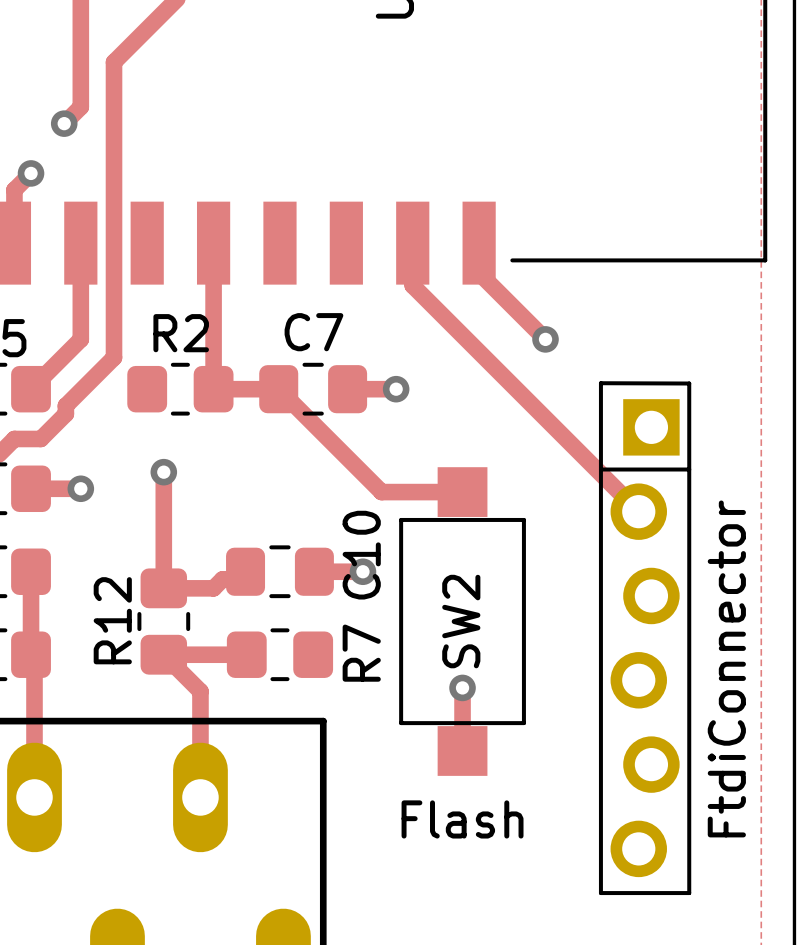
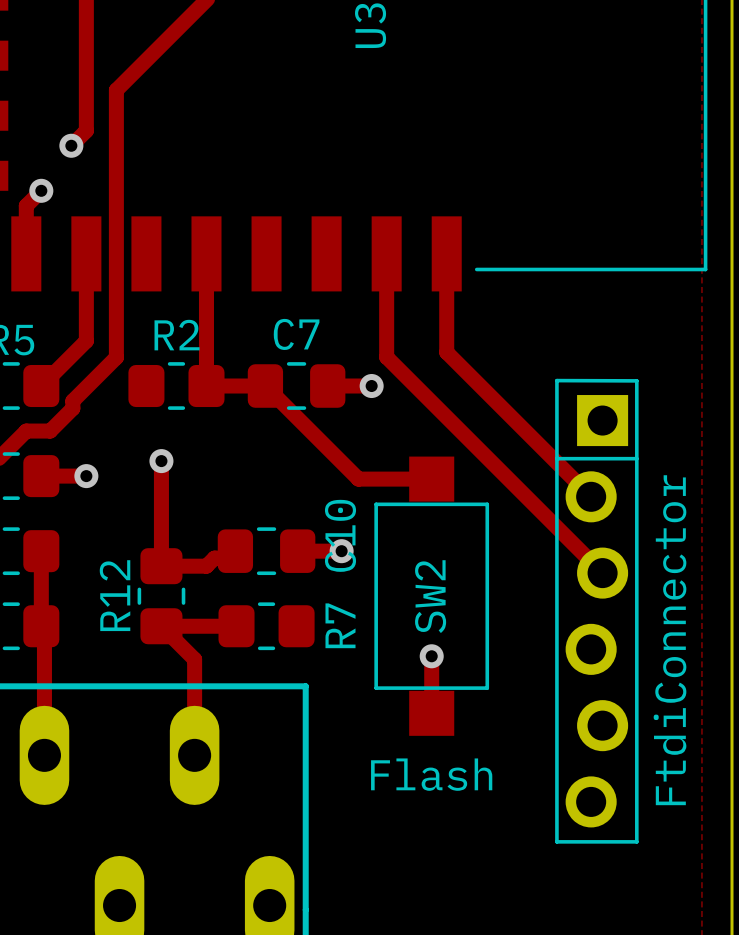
track: (479, 273) (545, 339) -> (446, 280) (446, 352)
track: (412, 285) (479, 352) -> (386, 292) (386, 357) (602, 573)
via: (545, 339) -> none

